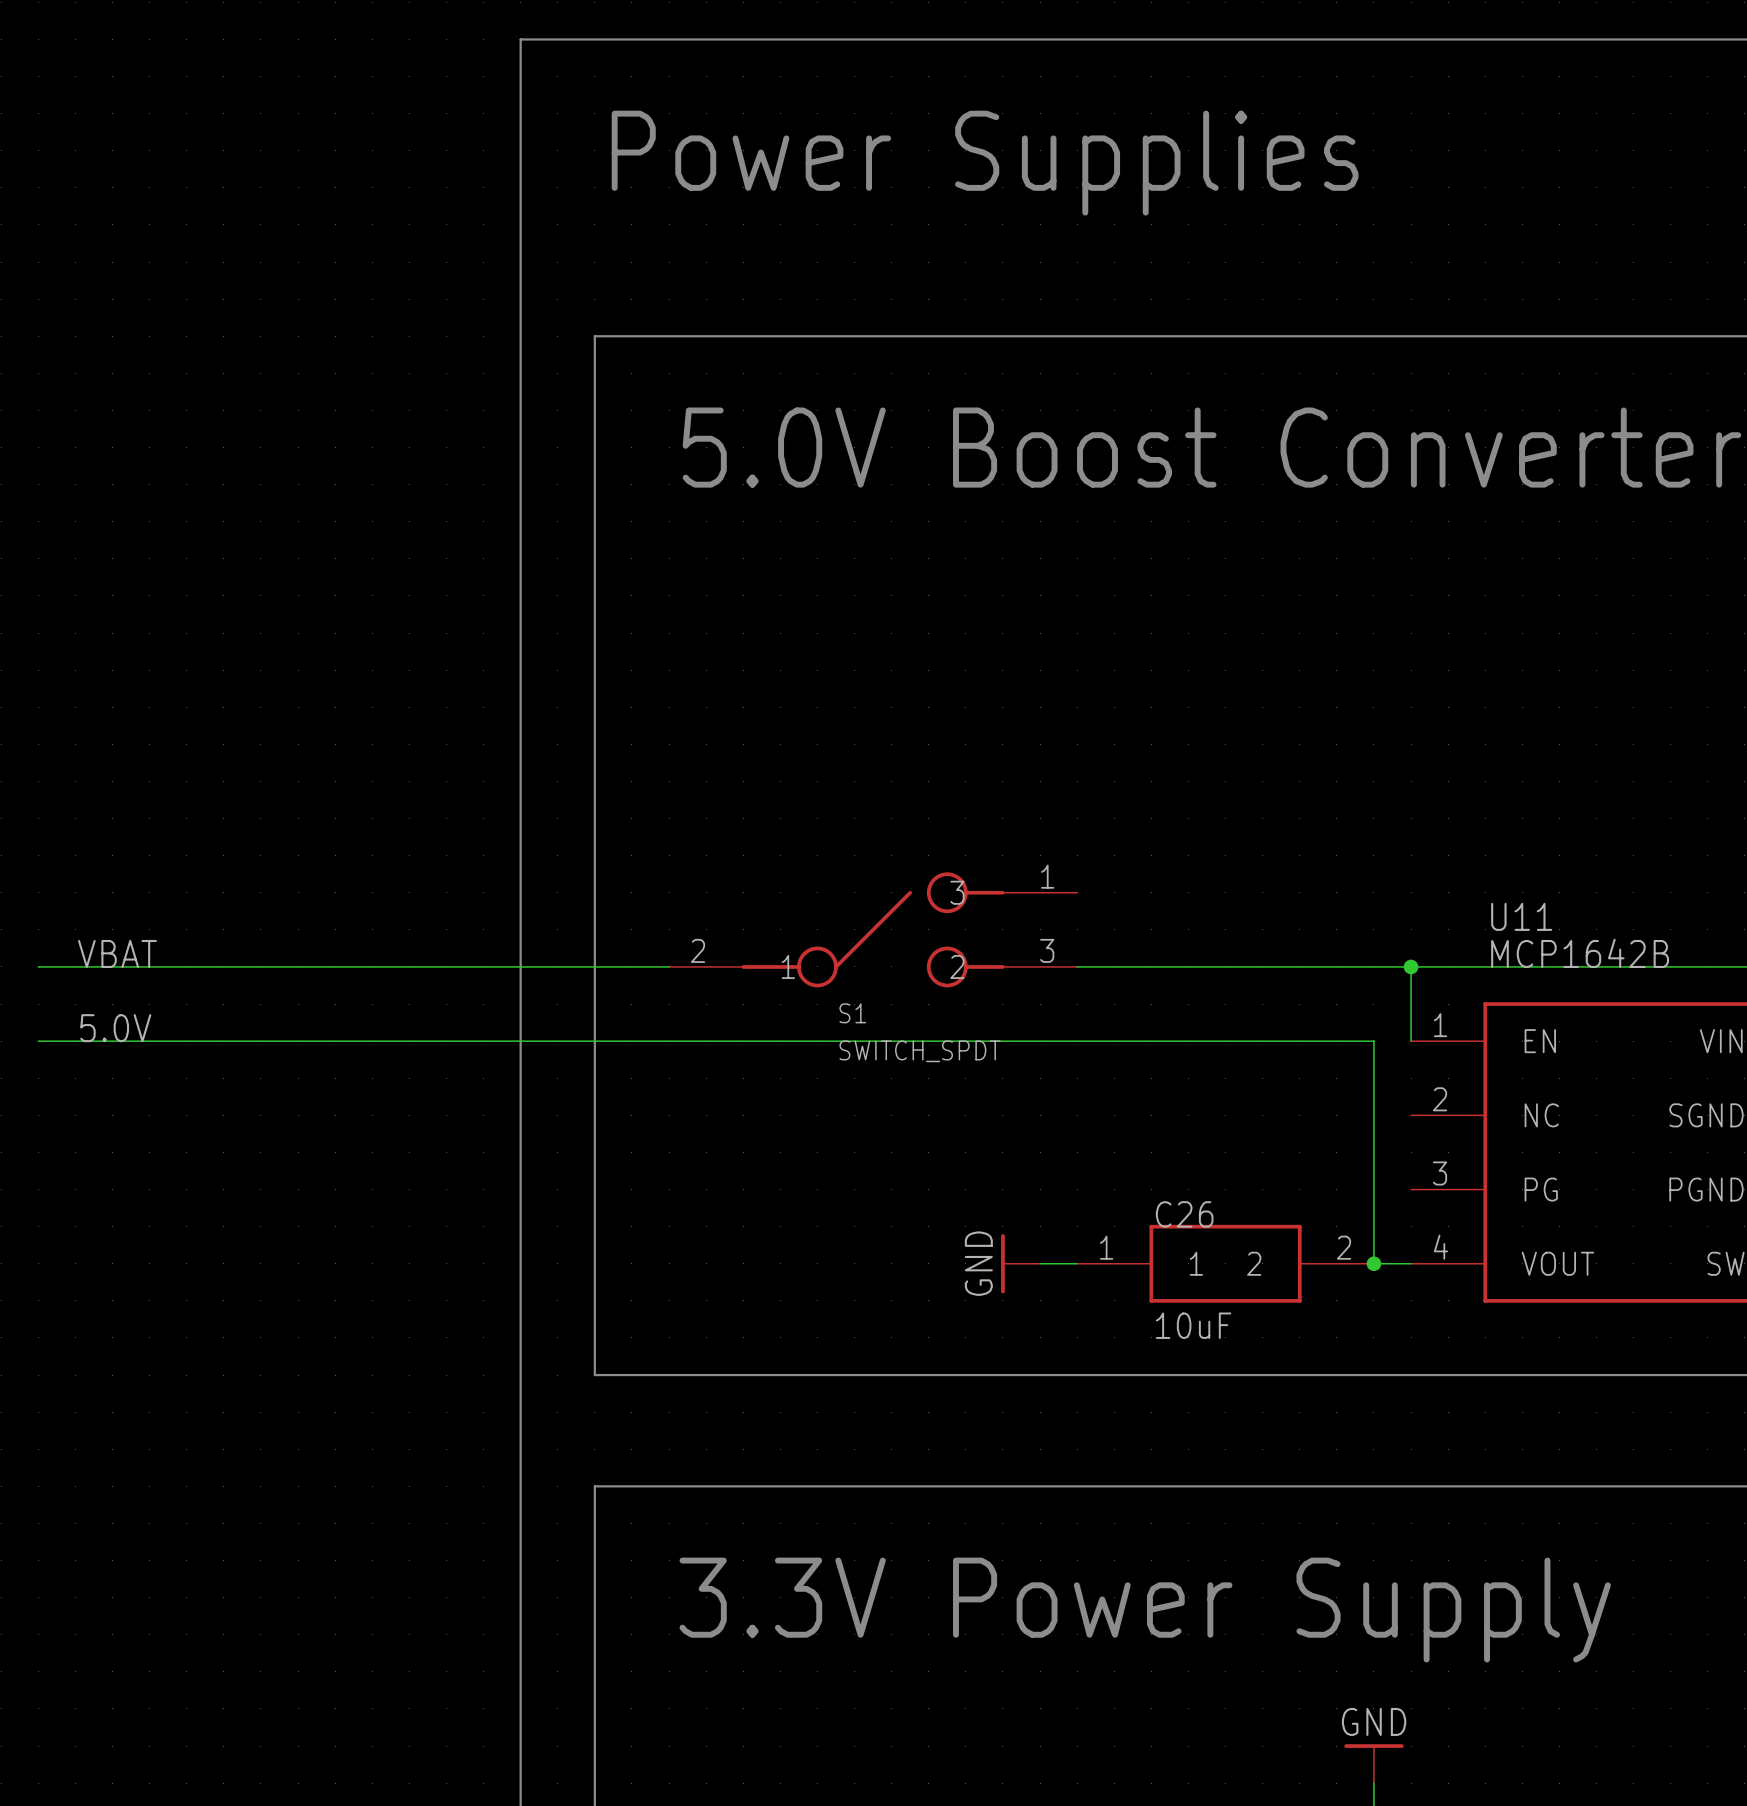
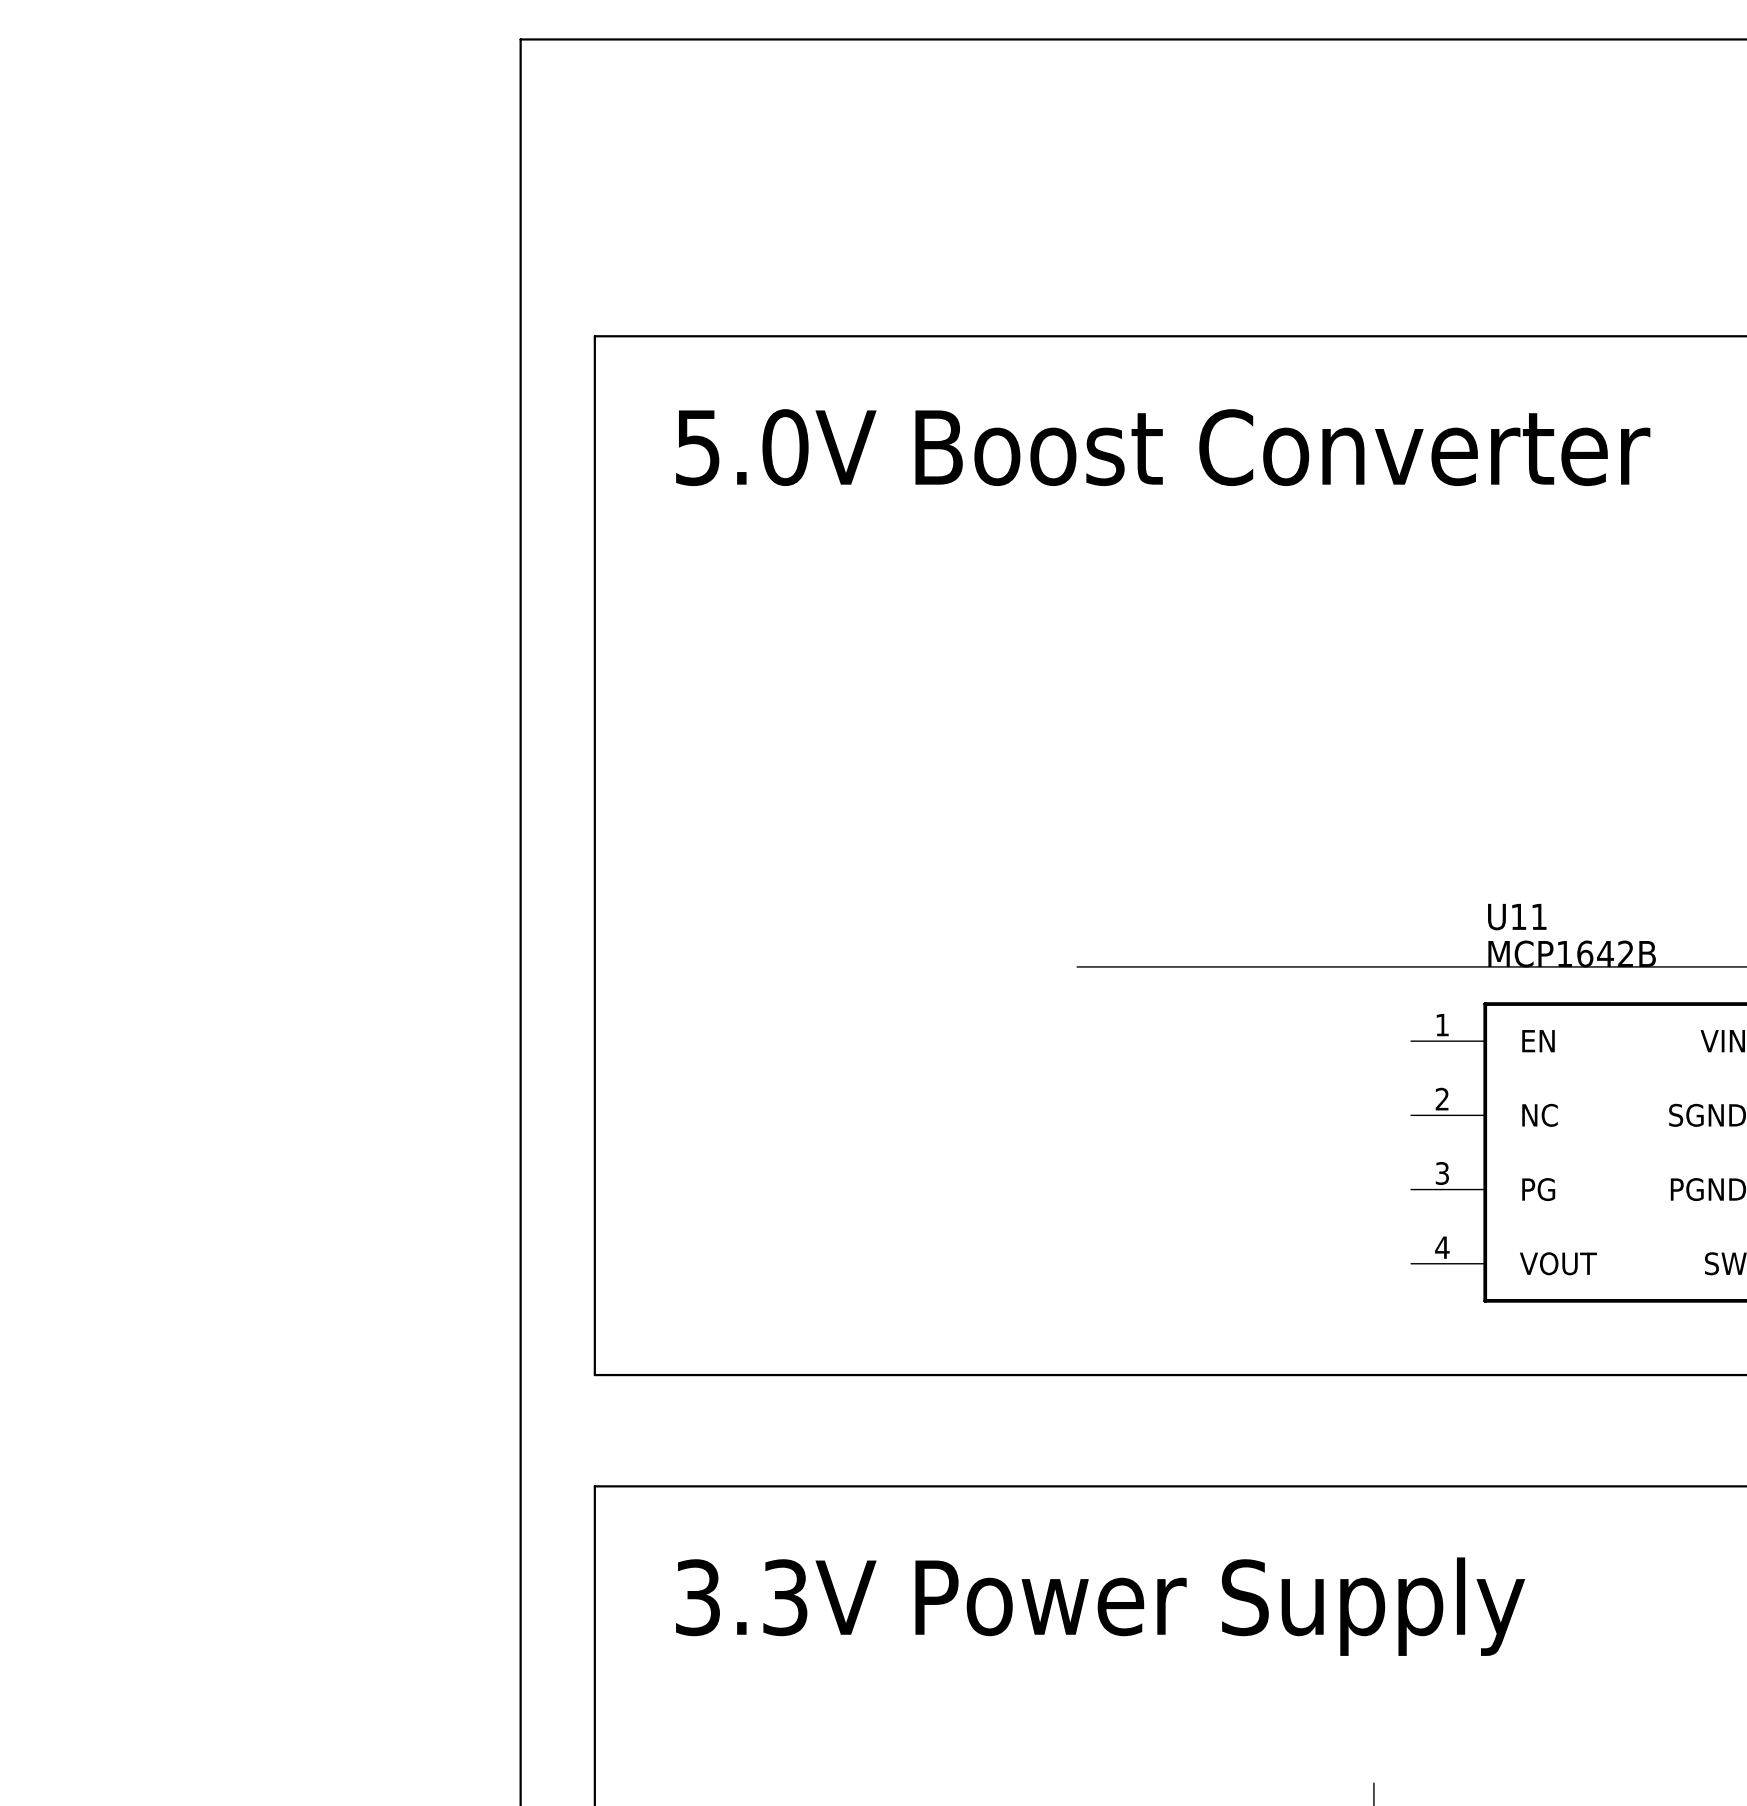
text: Power Supplies (985, 163) -> none
S1: SWITCH_SPDT (873, 929) -> none
label: VBAT (117, 953) -> none
wire: (38, 966) (669, 966) -> none
wire: (1411, 966) (1411, 1041) -> none
junction: (1411, 966) -> none
label: 5.0V (115, 1028) -> none
wire: (38, 1041) (1373, 1041) (1373, 1263) (1411, 1263) -> none
power symbol: GND (1020, 1263) -> none
wire: (1040, 1263) (1077, 1263) -> none
C26: 10uF (1225, 1263) -> none
junction: (1373, 1263) -> none
power symbol: GND (1373, 1763) -> none

